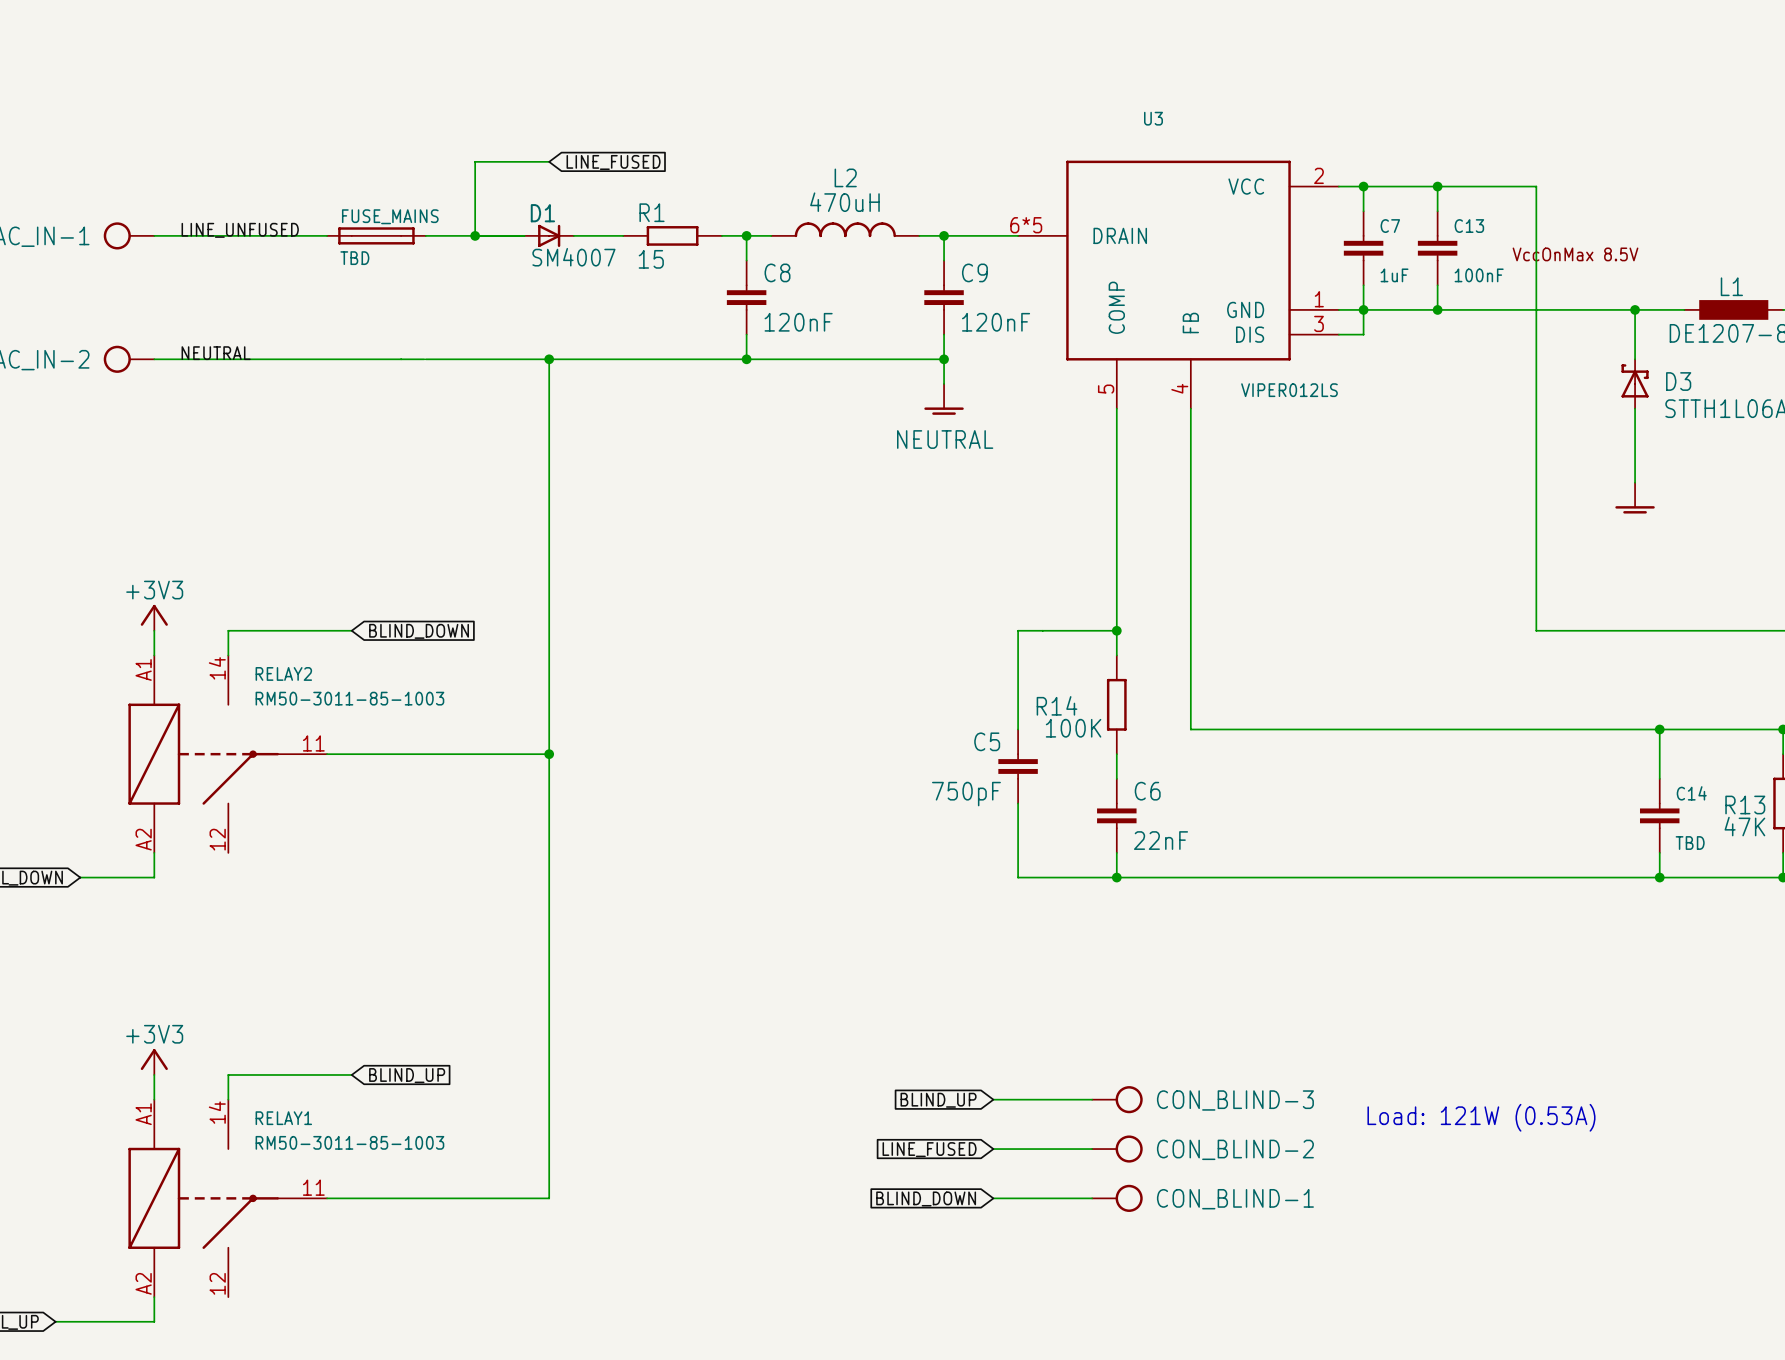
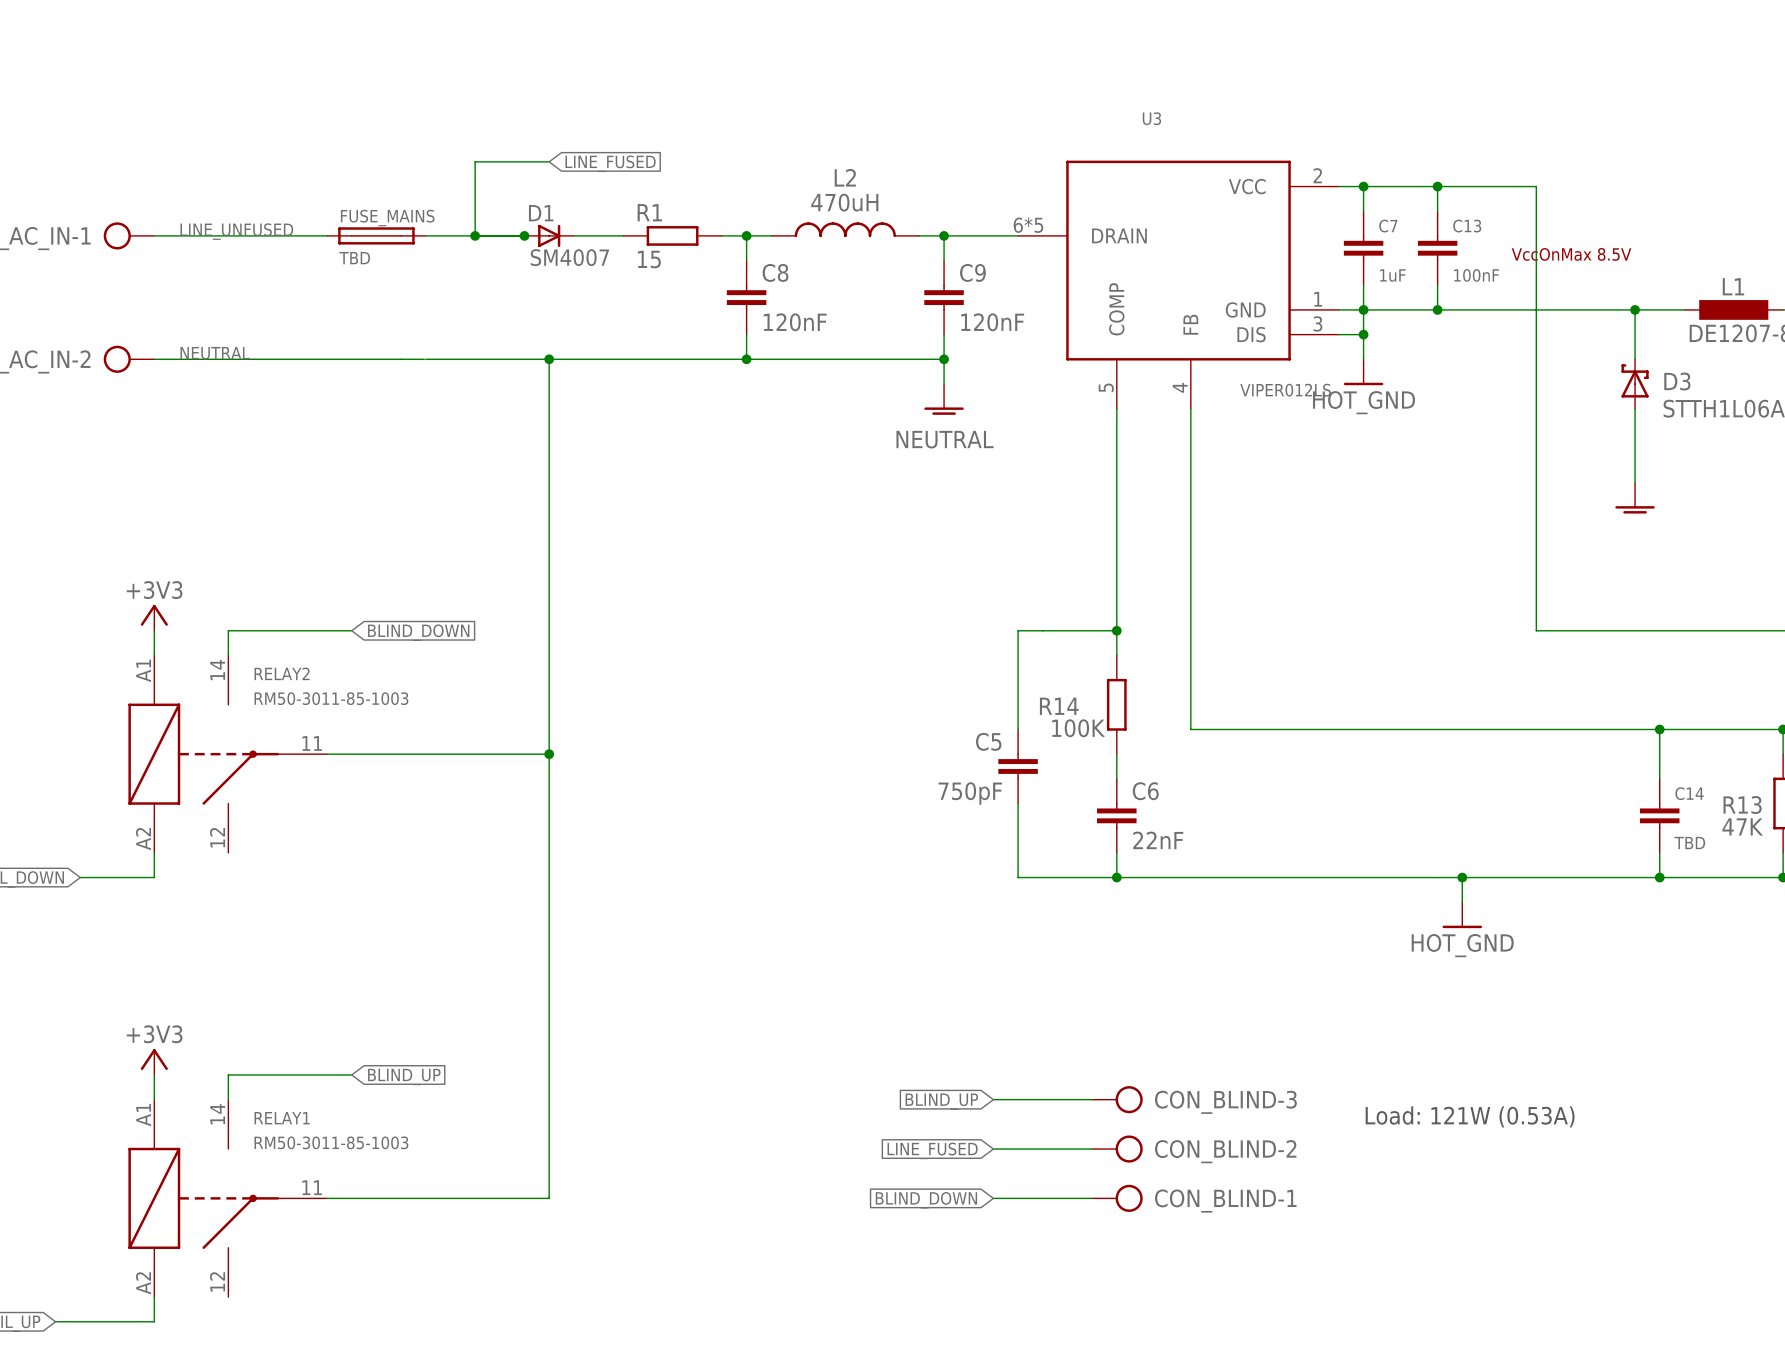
junction: none -> (524, 235)
wire: none -> (1363, 334) (1363, 359)
junction: none -> (1363, 334)
power symbol: none -> HOT_GND (1363, 372)
wire: none -> (1462, 877) (1462, 902)
junction: none -> (1462, 877)
power symbol: none -> HOT_GND (1462, 915)

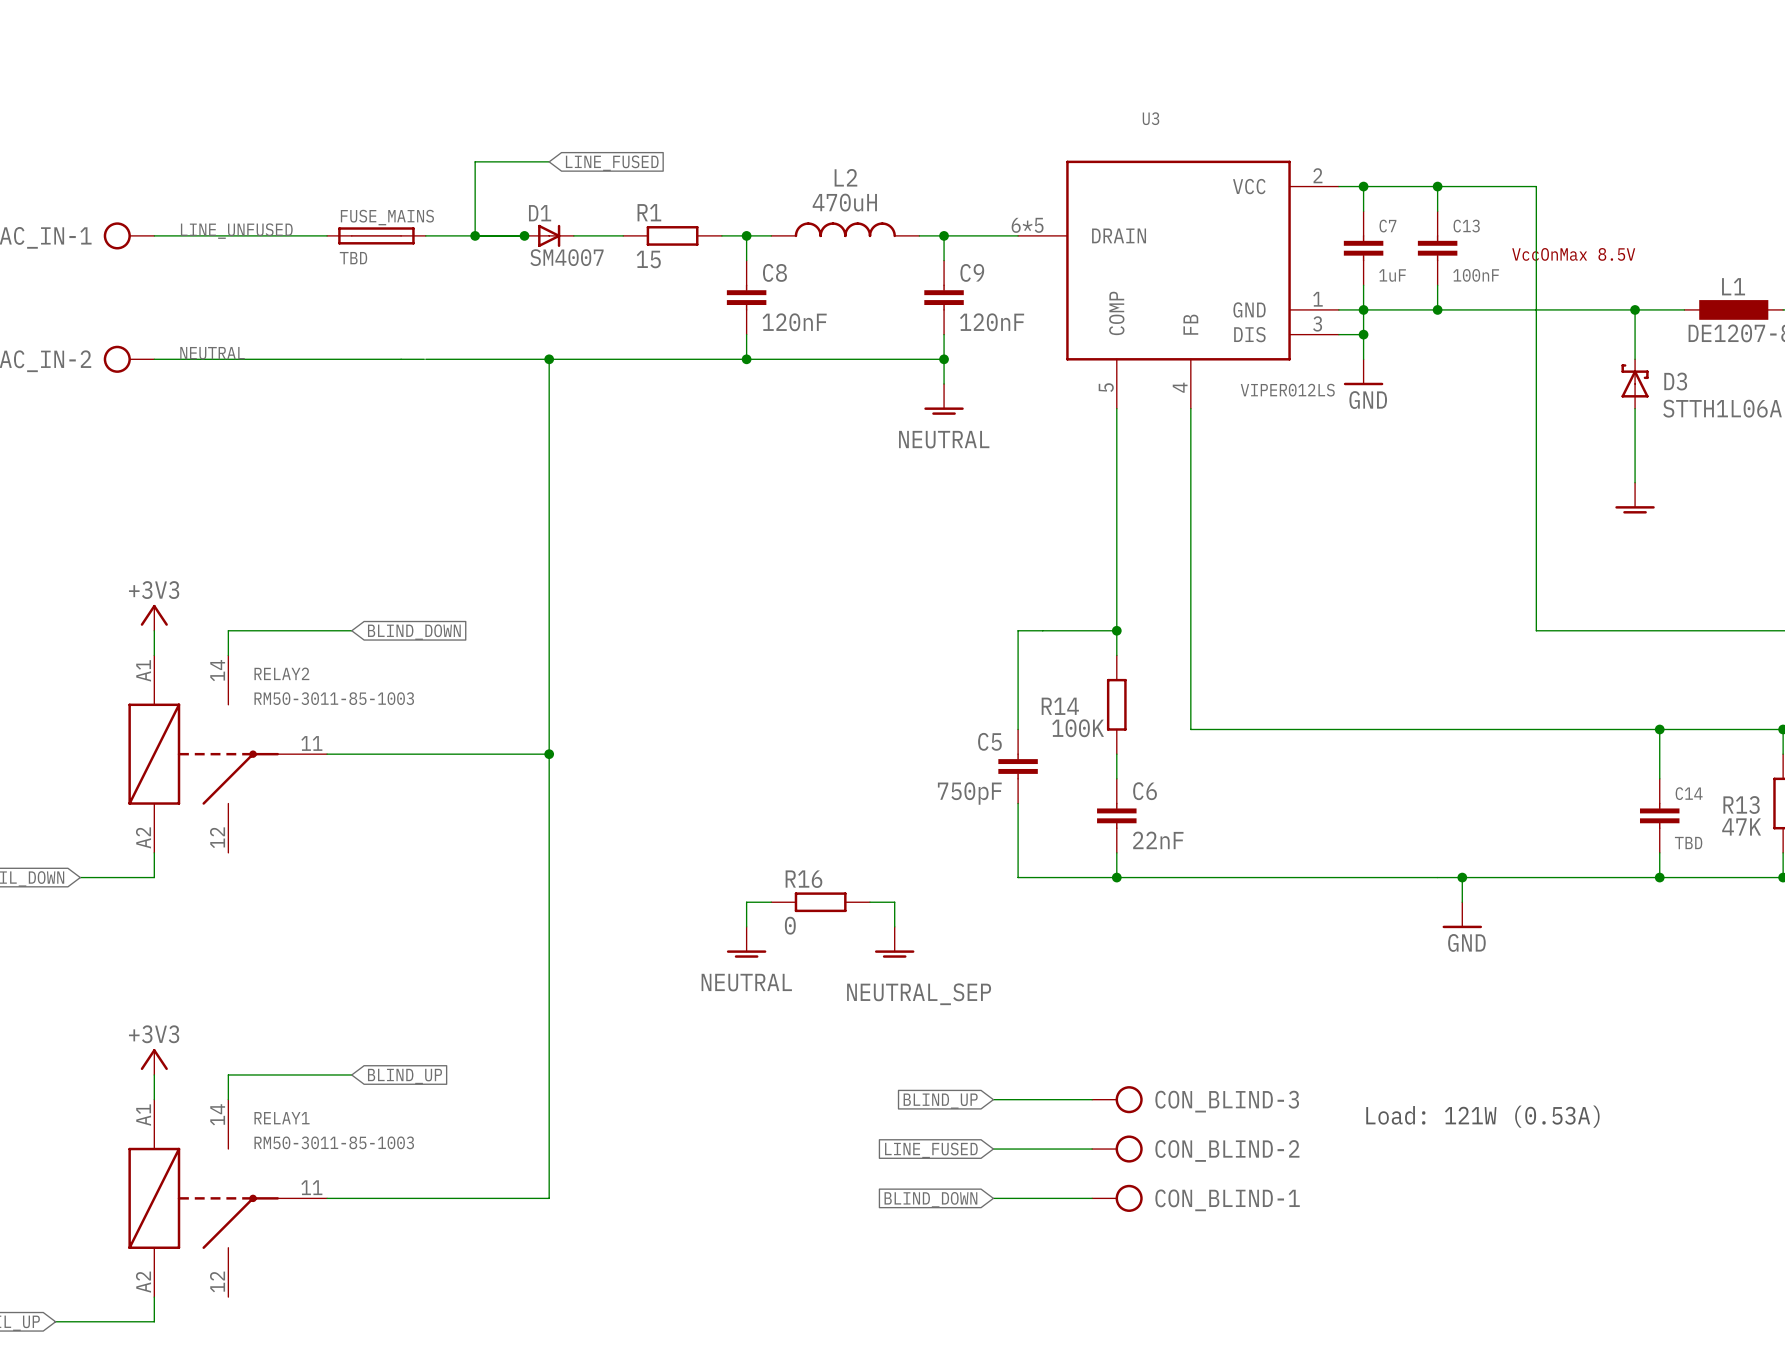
power symbol: HOT_GND (1363, 372) -> GND (1363, 372)
wire: none -> (771, 902) (746, 902) (746, 926)
R16: none -> 0 (820, 902)
wire: none -> (870, 902) (894, 902) (894, 926)
power symbol: HOT_GND (1462, 915) -> GND (1462, 915)
power symbol: none -> NEUTRAL (746, 942)
power symbol: none -> (894, 942)
label: none -> NEUTRAL_SEP (919, 994)

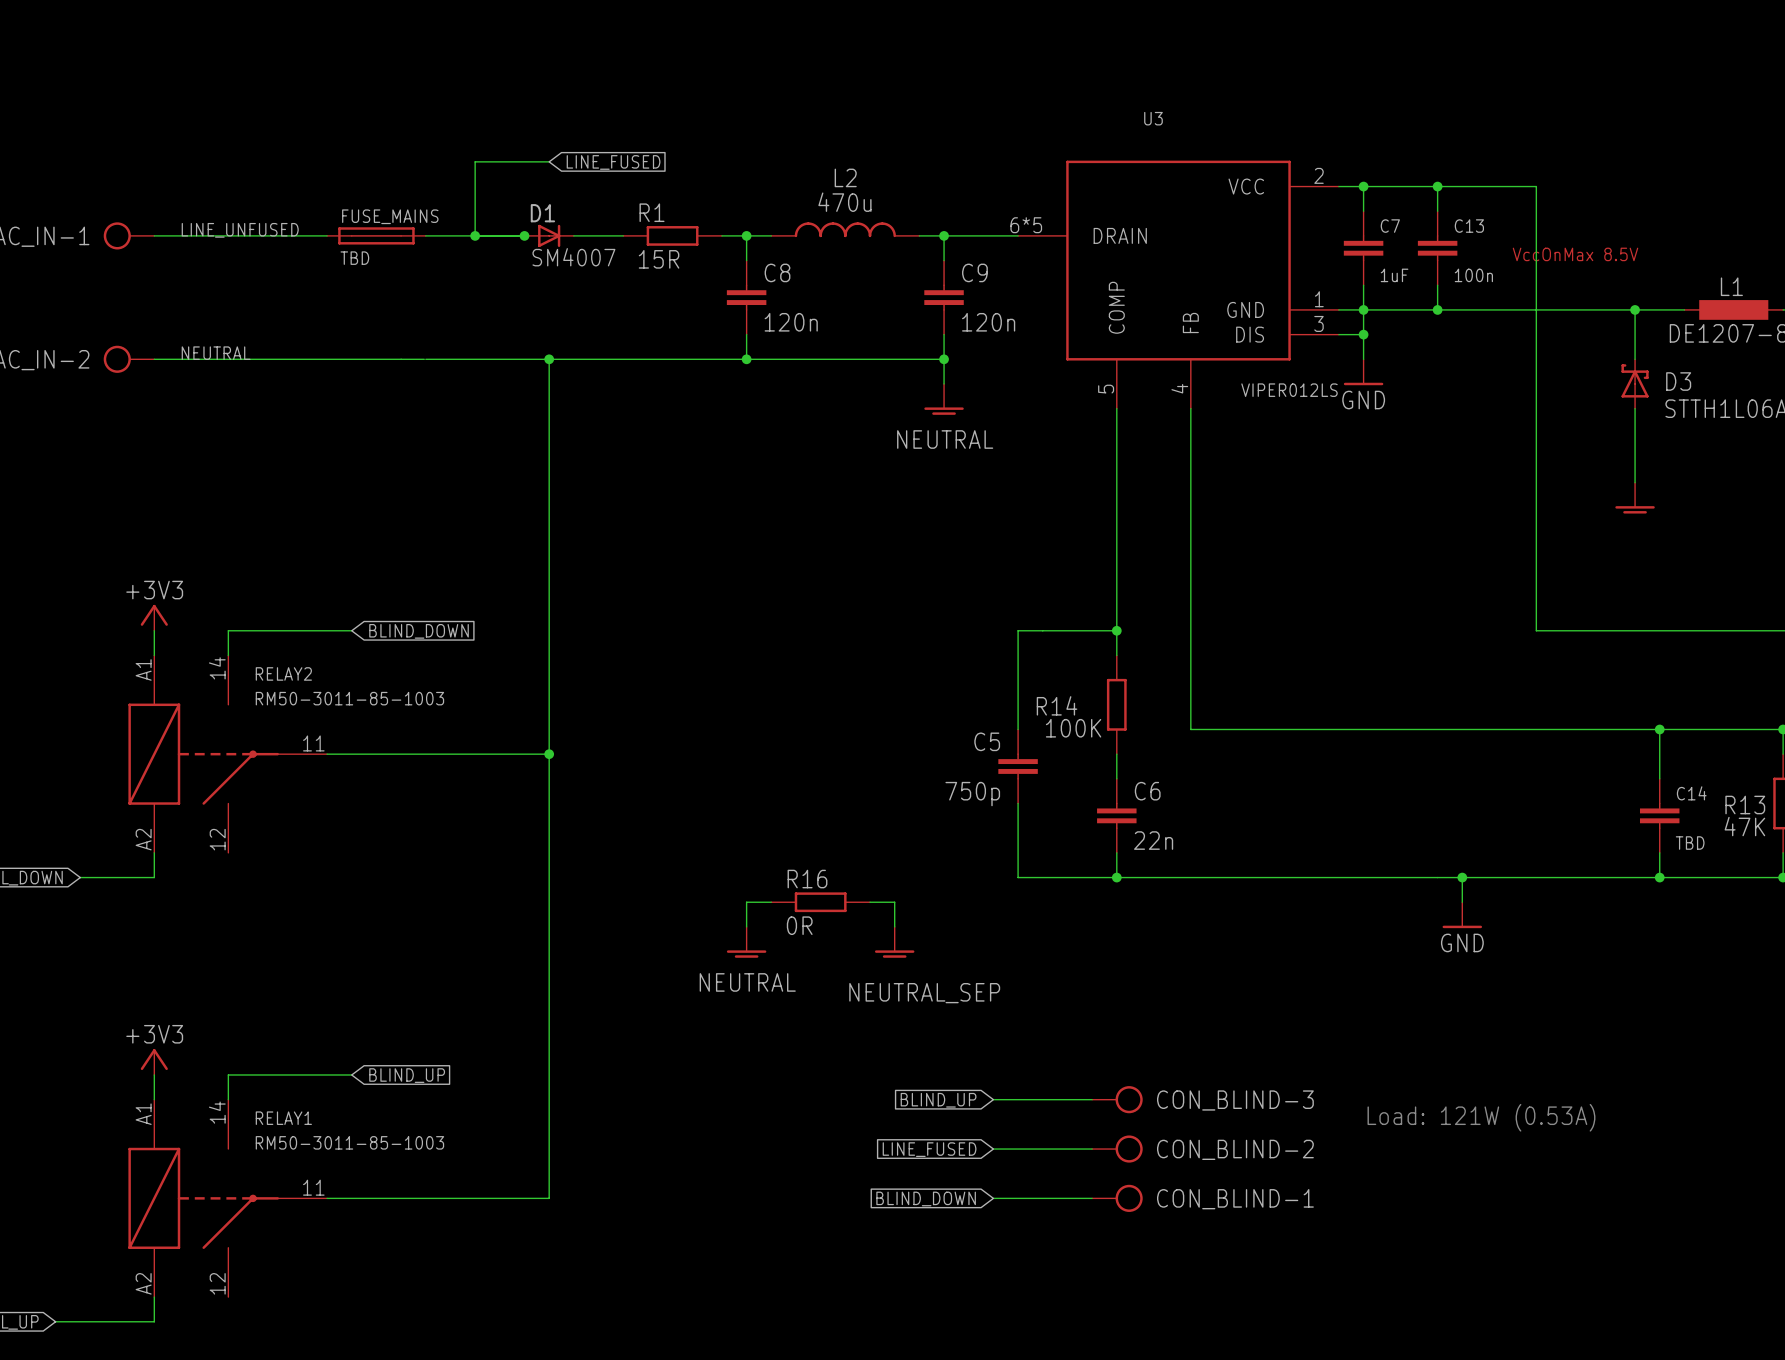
L2 value: 470uH (844, 202) -> 470u (844, 202)
R1 value: 15 (648, 259) -> 15R (659, 259)
C13 value: 100nF (1476, 275) -> 100n (1473, 275)
C8 value: 120nF (794, 322) -> 120n (791, 322)
C9 value: 120nF (992, 322) -> 120n (988, 322)
C5 value: 750pF (969, 793) -> 750p (972, 794)
C6 value: 22nF (1158, 840) -> 22n (1153, 840)
R16 value: 0 (790, 925) -> 0R (799, 925)

